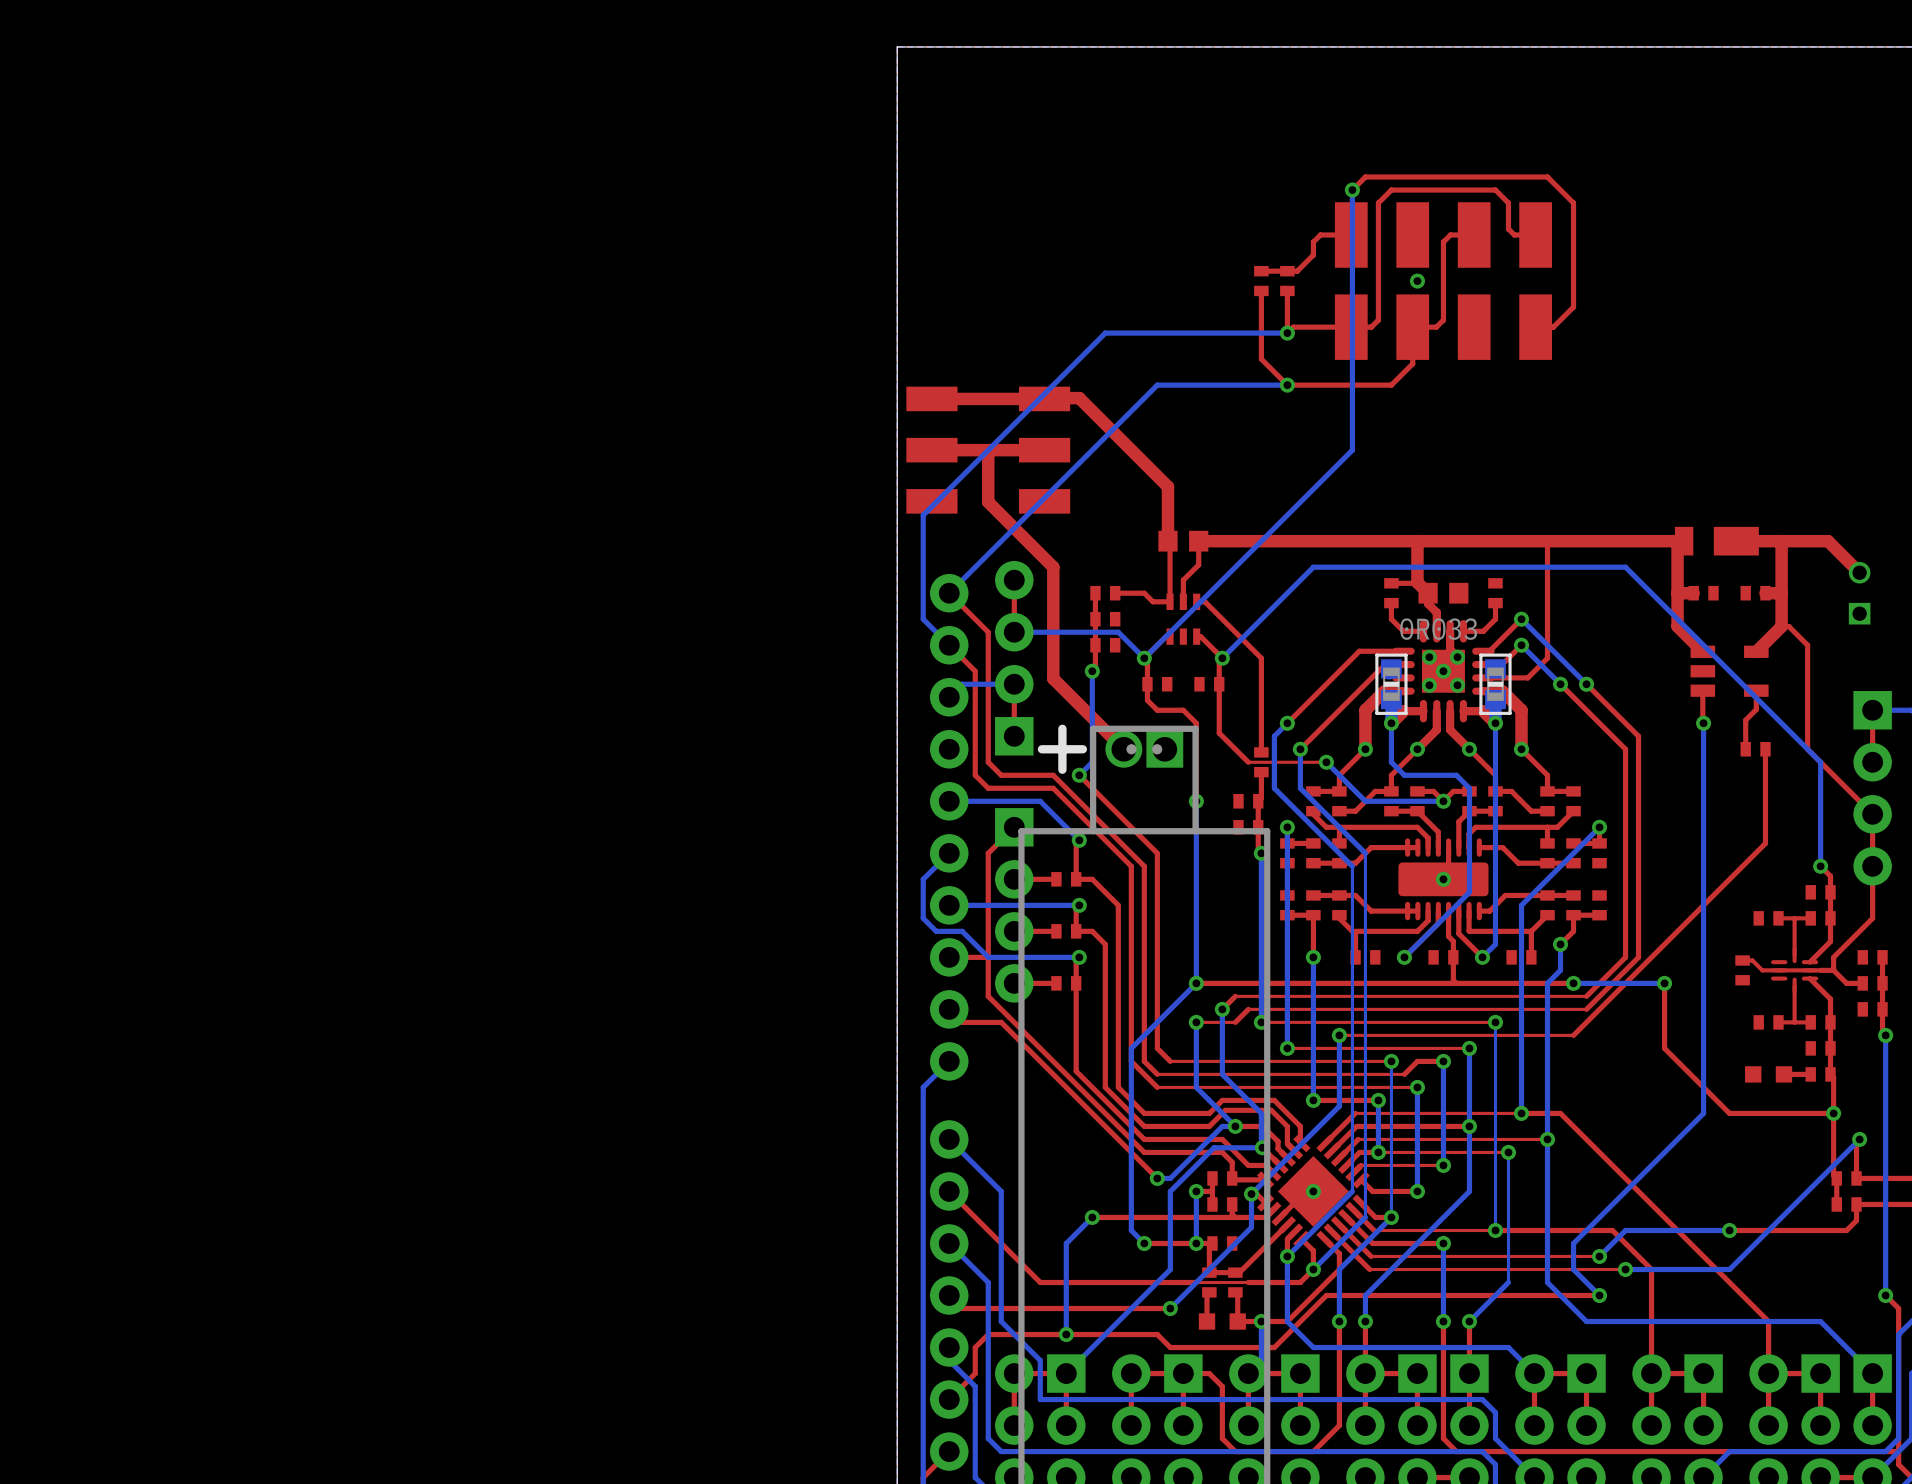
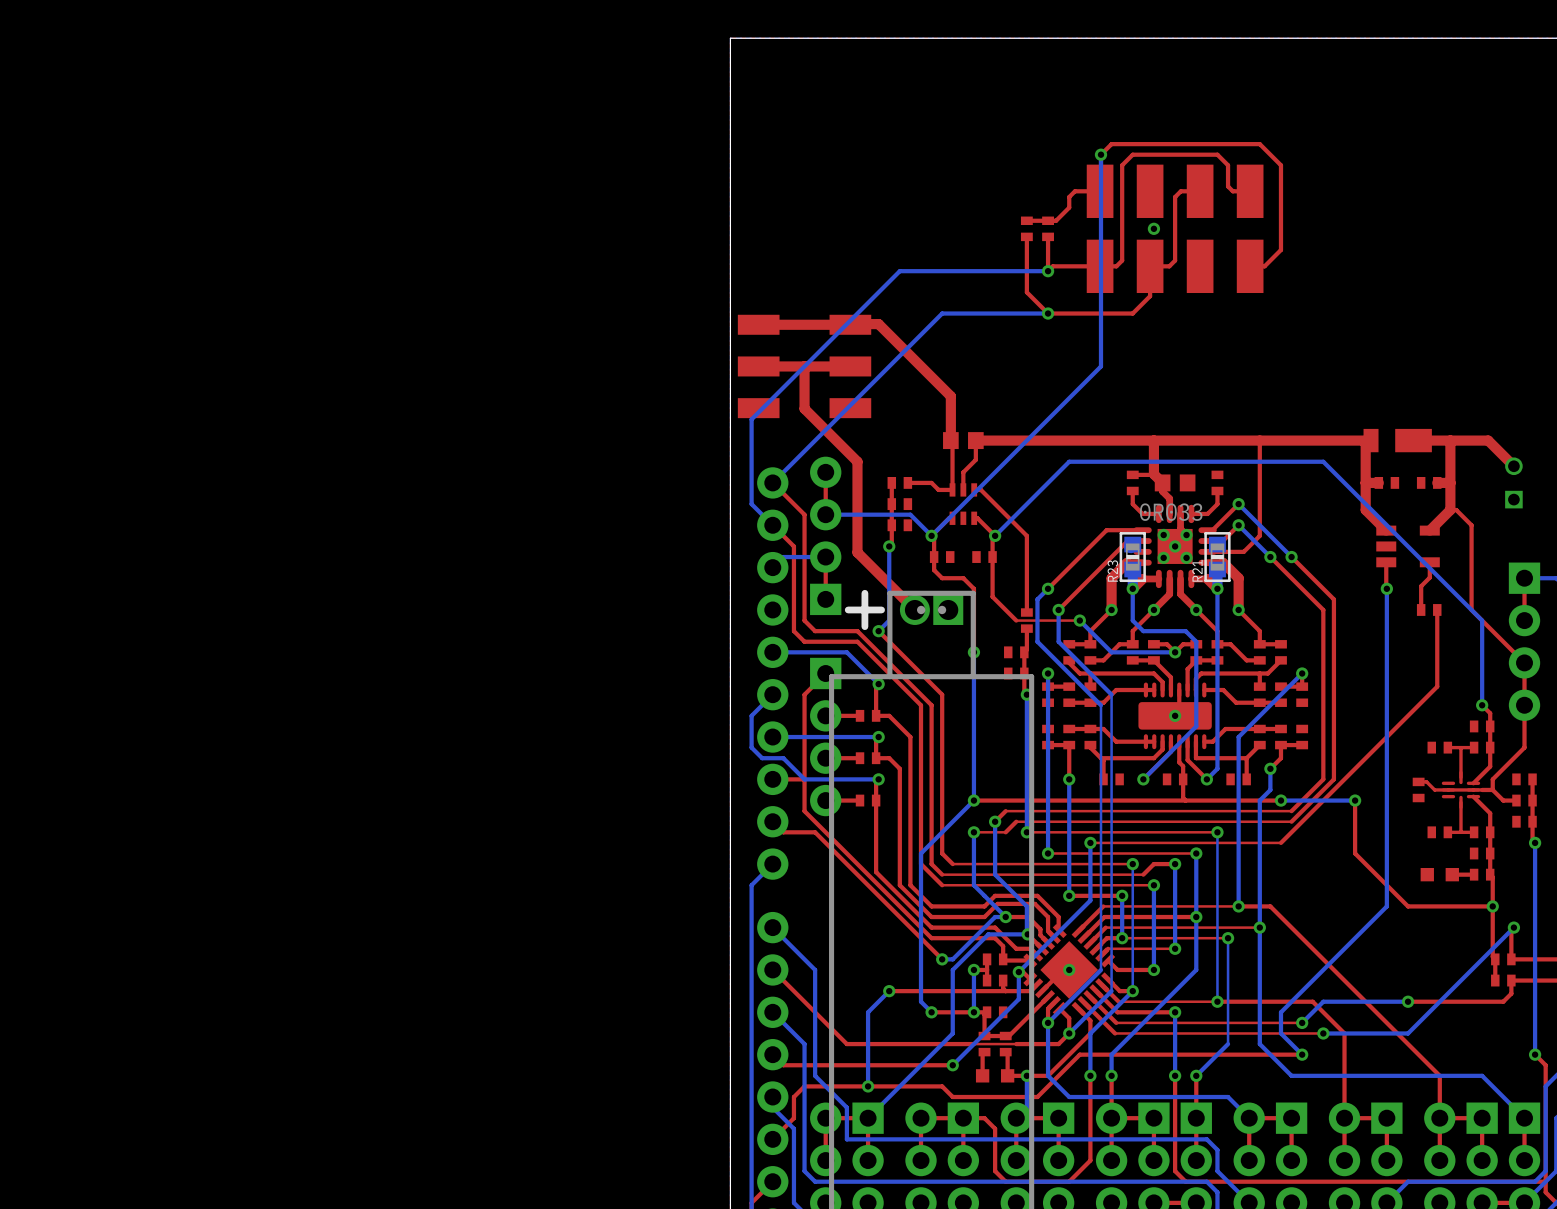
R23 name: none -> R23 (1112, 571)
R21 name: none -> R21 (1197, 570)

